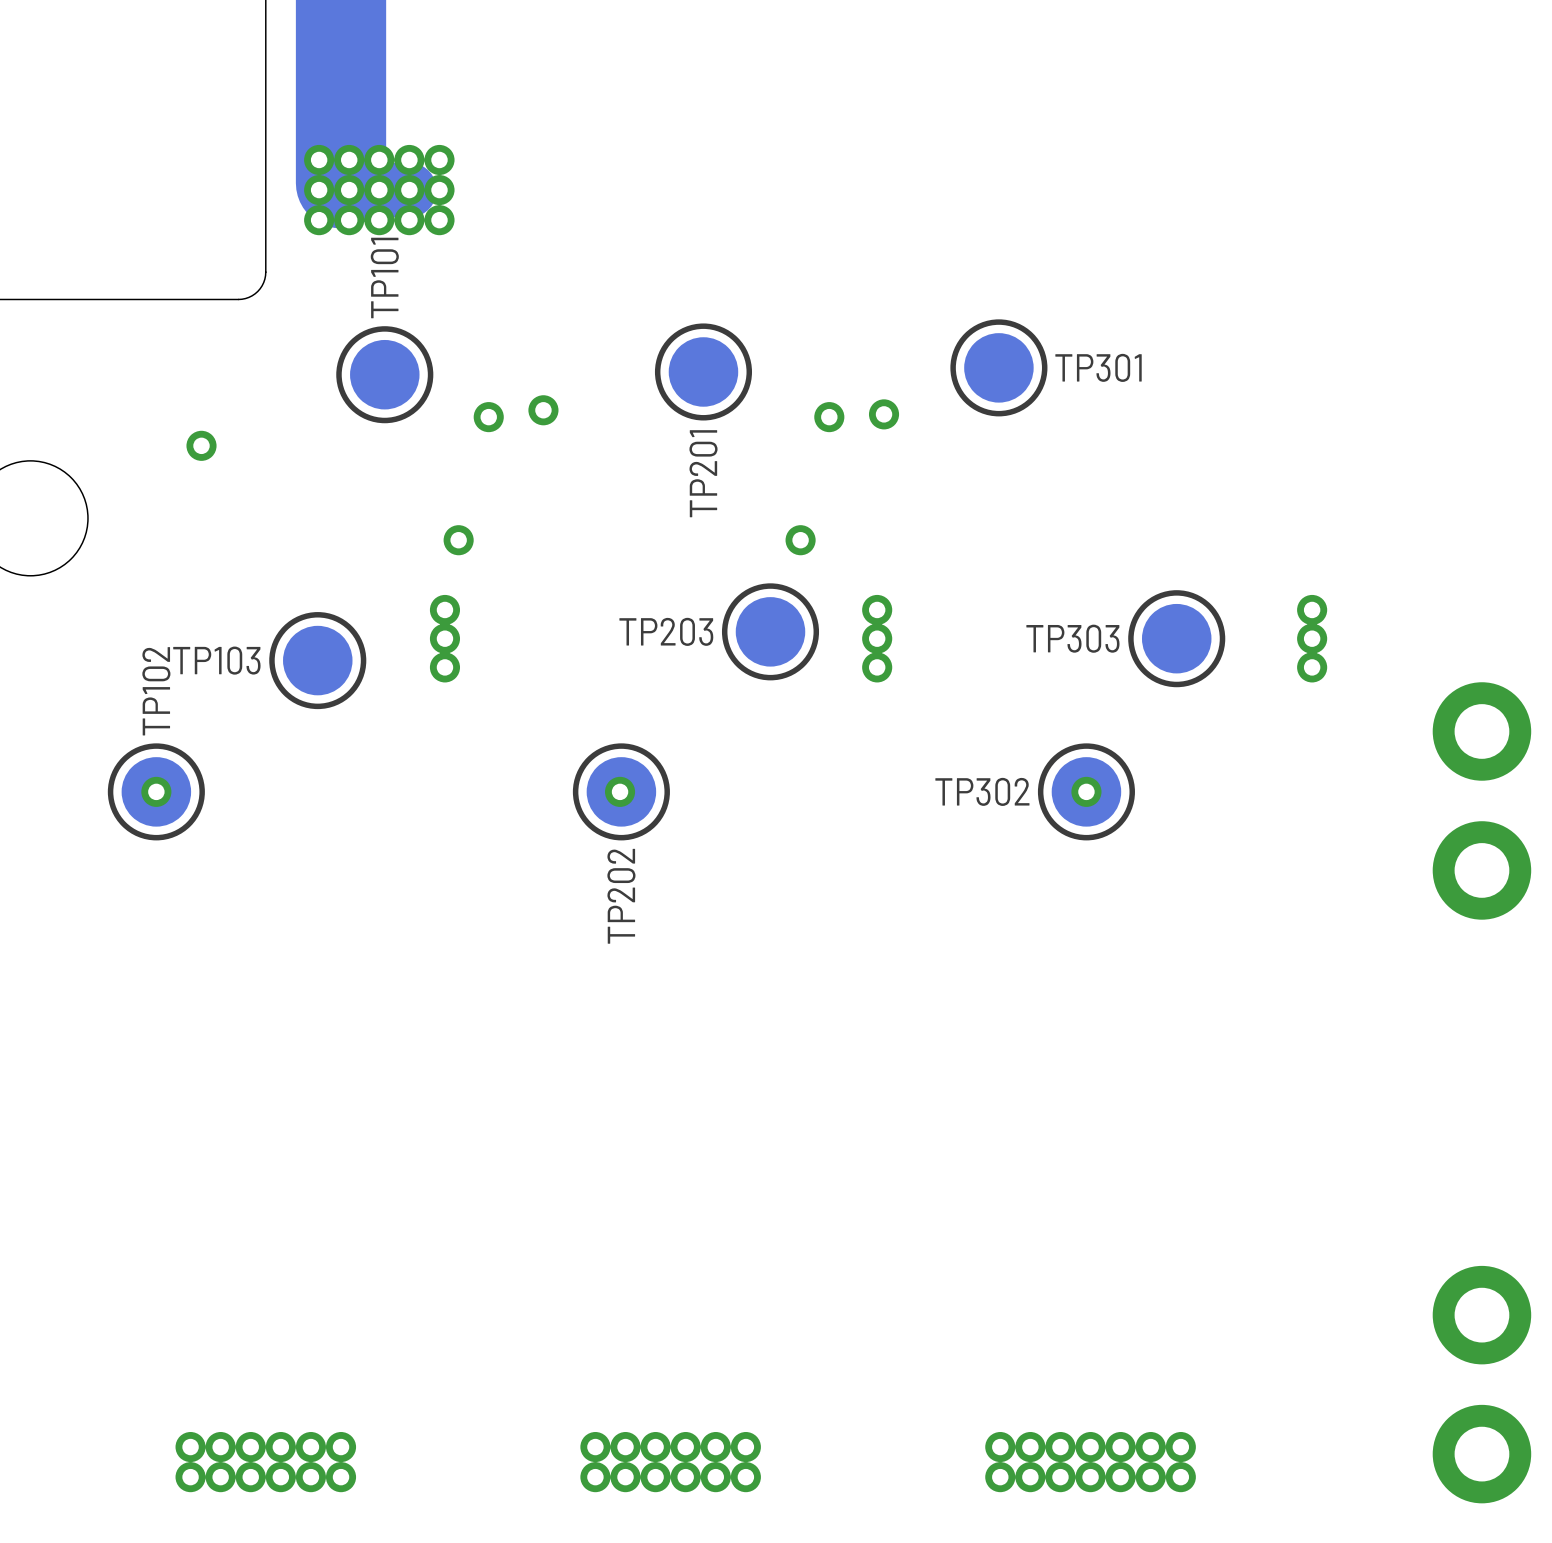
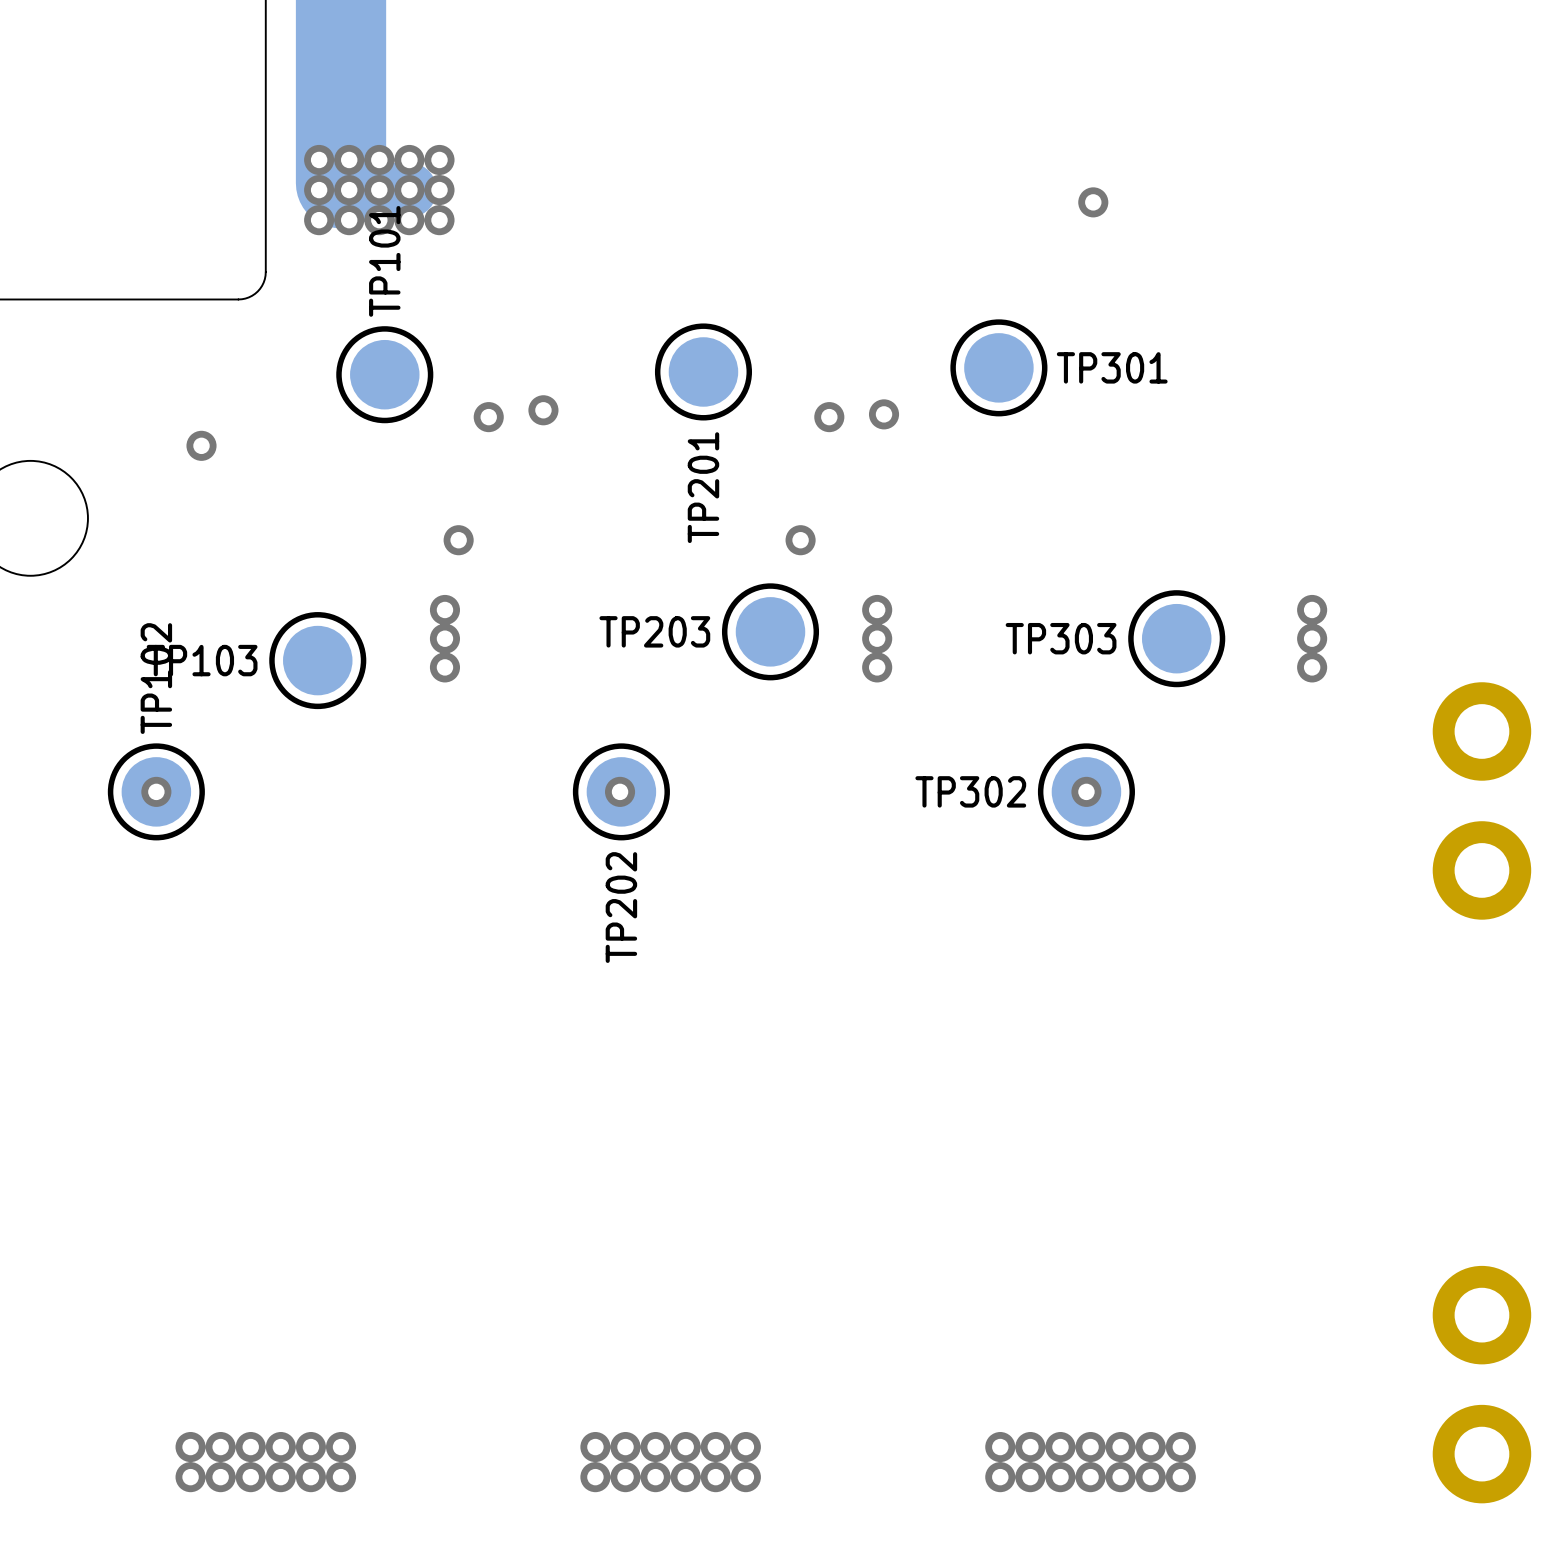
via: none -> (1093, 202)

